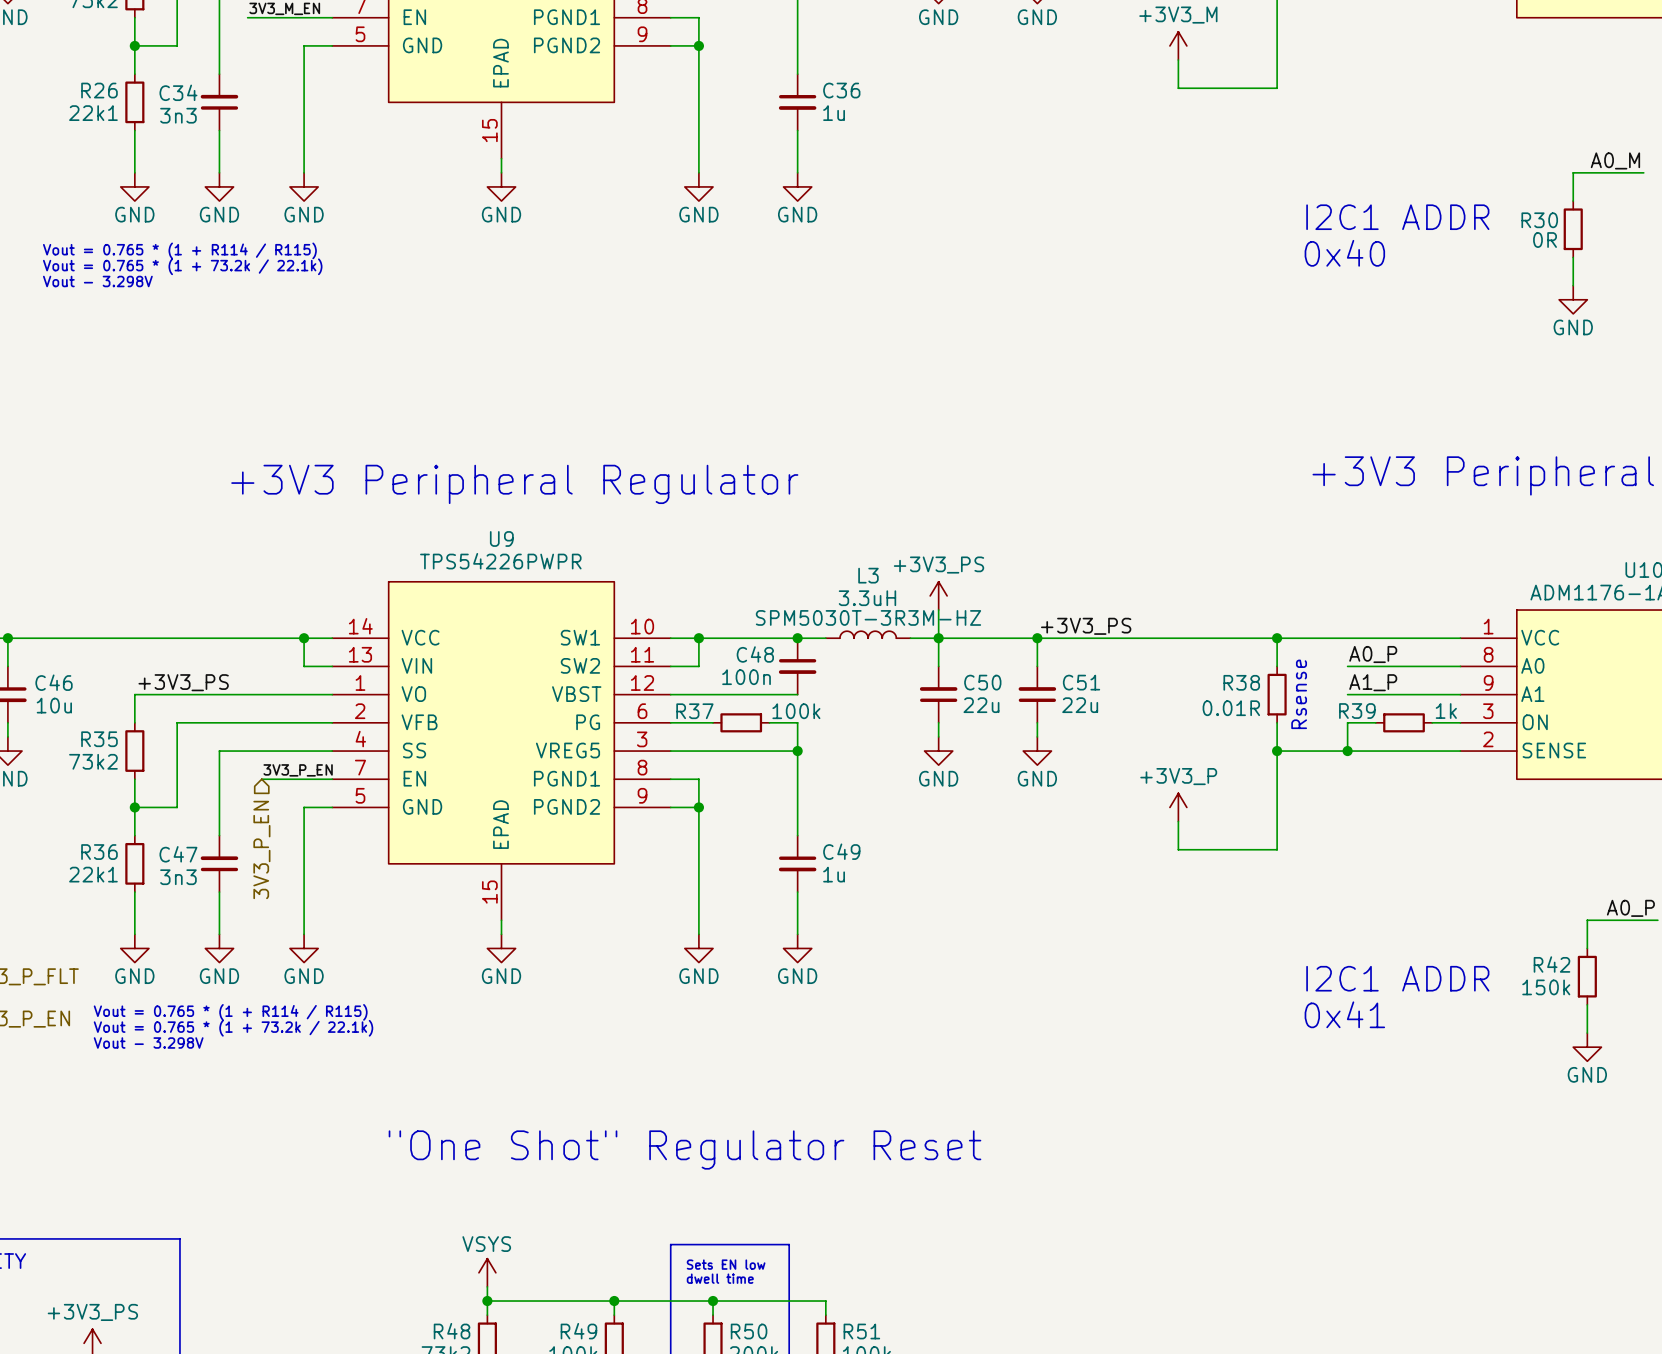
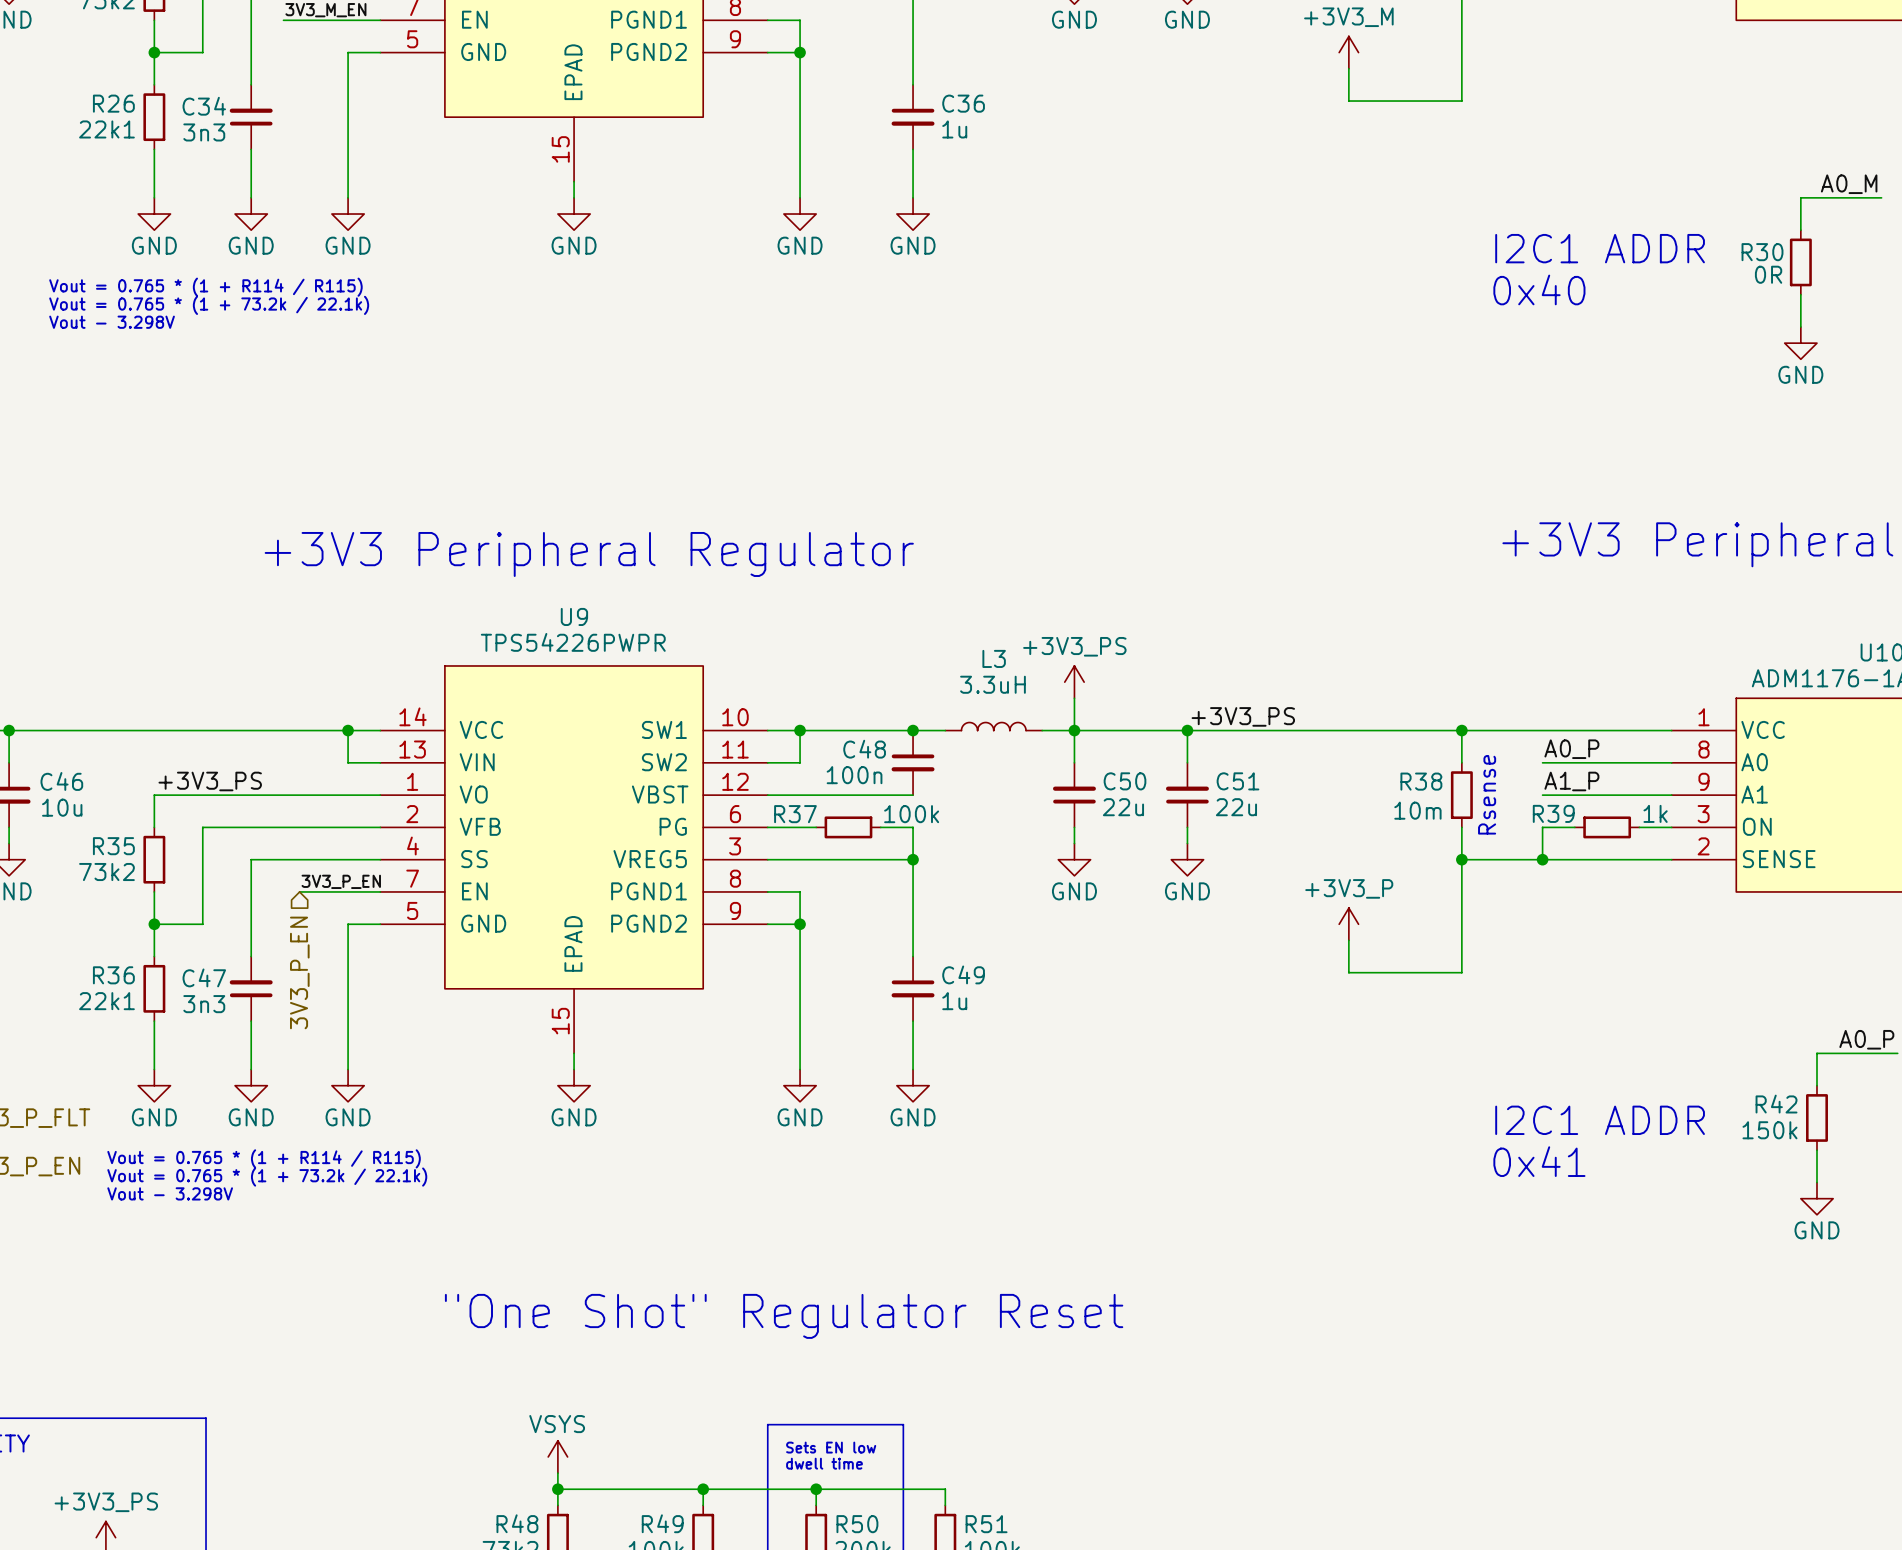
L3 text: SPM5030T-3R3M-HZ (868, 617) -> none
R38 value: 0.01R (1231, 708) -> 10m (1417, 810)

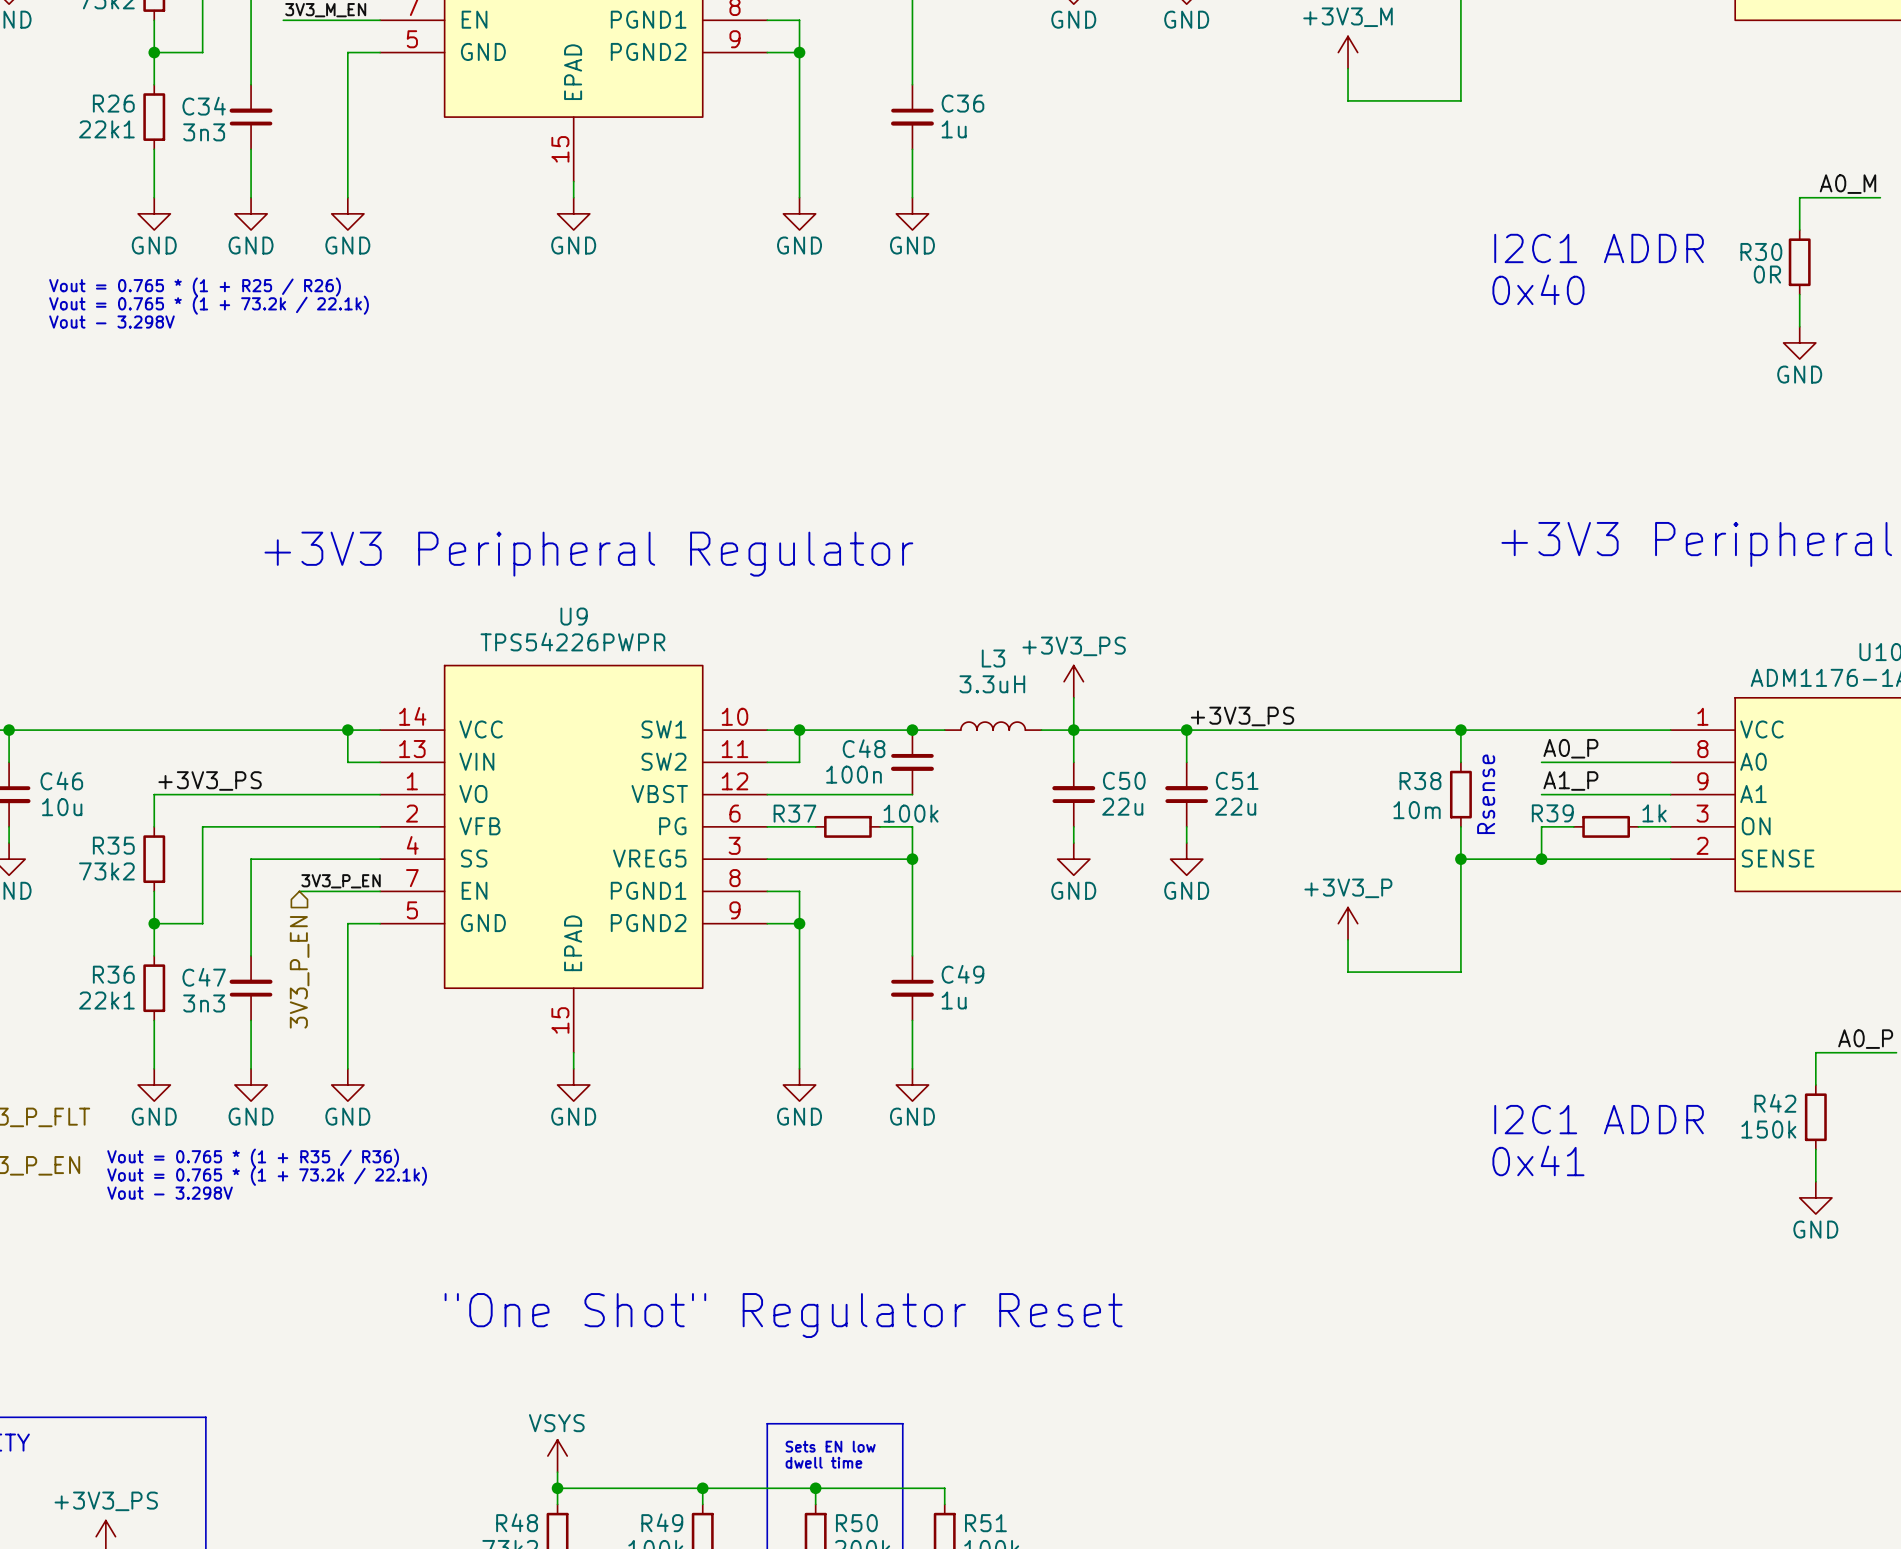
text: Vout = 0.765 * (1 + R114 / R115) (205, 287) -> Vout = 0.765 * (1 + R25 / R26) (195, 287)
text: Vout = 0.765 * (1 + R114 / R115) (264, 1158) -> Vout = 0.765 * (1 + R35 / R36) (253, 1158)

